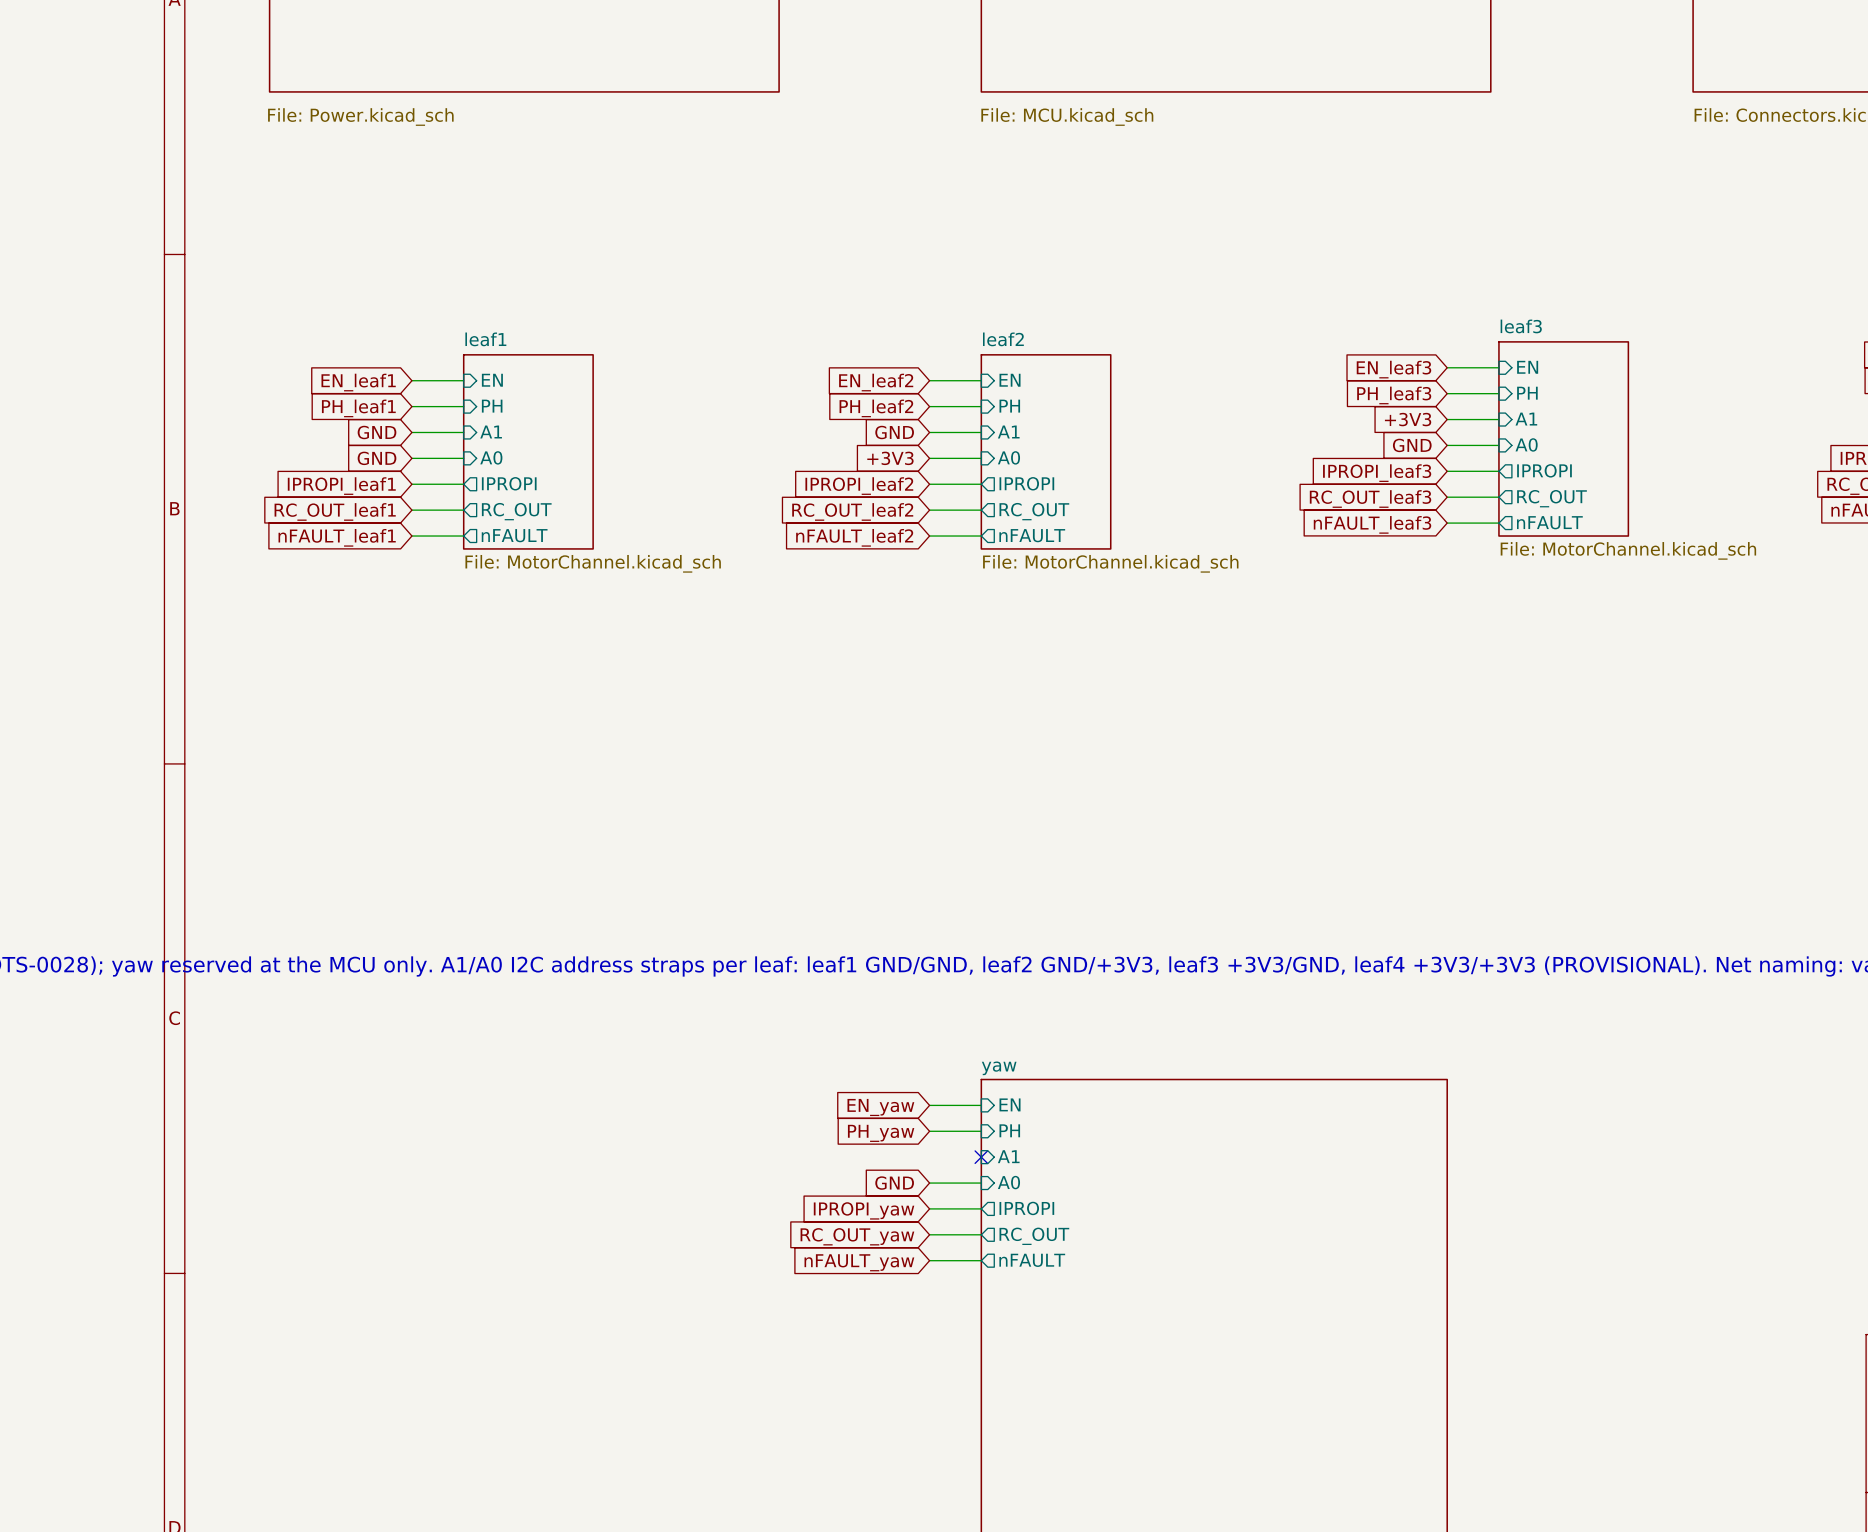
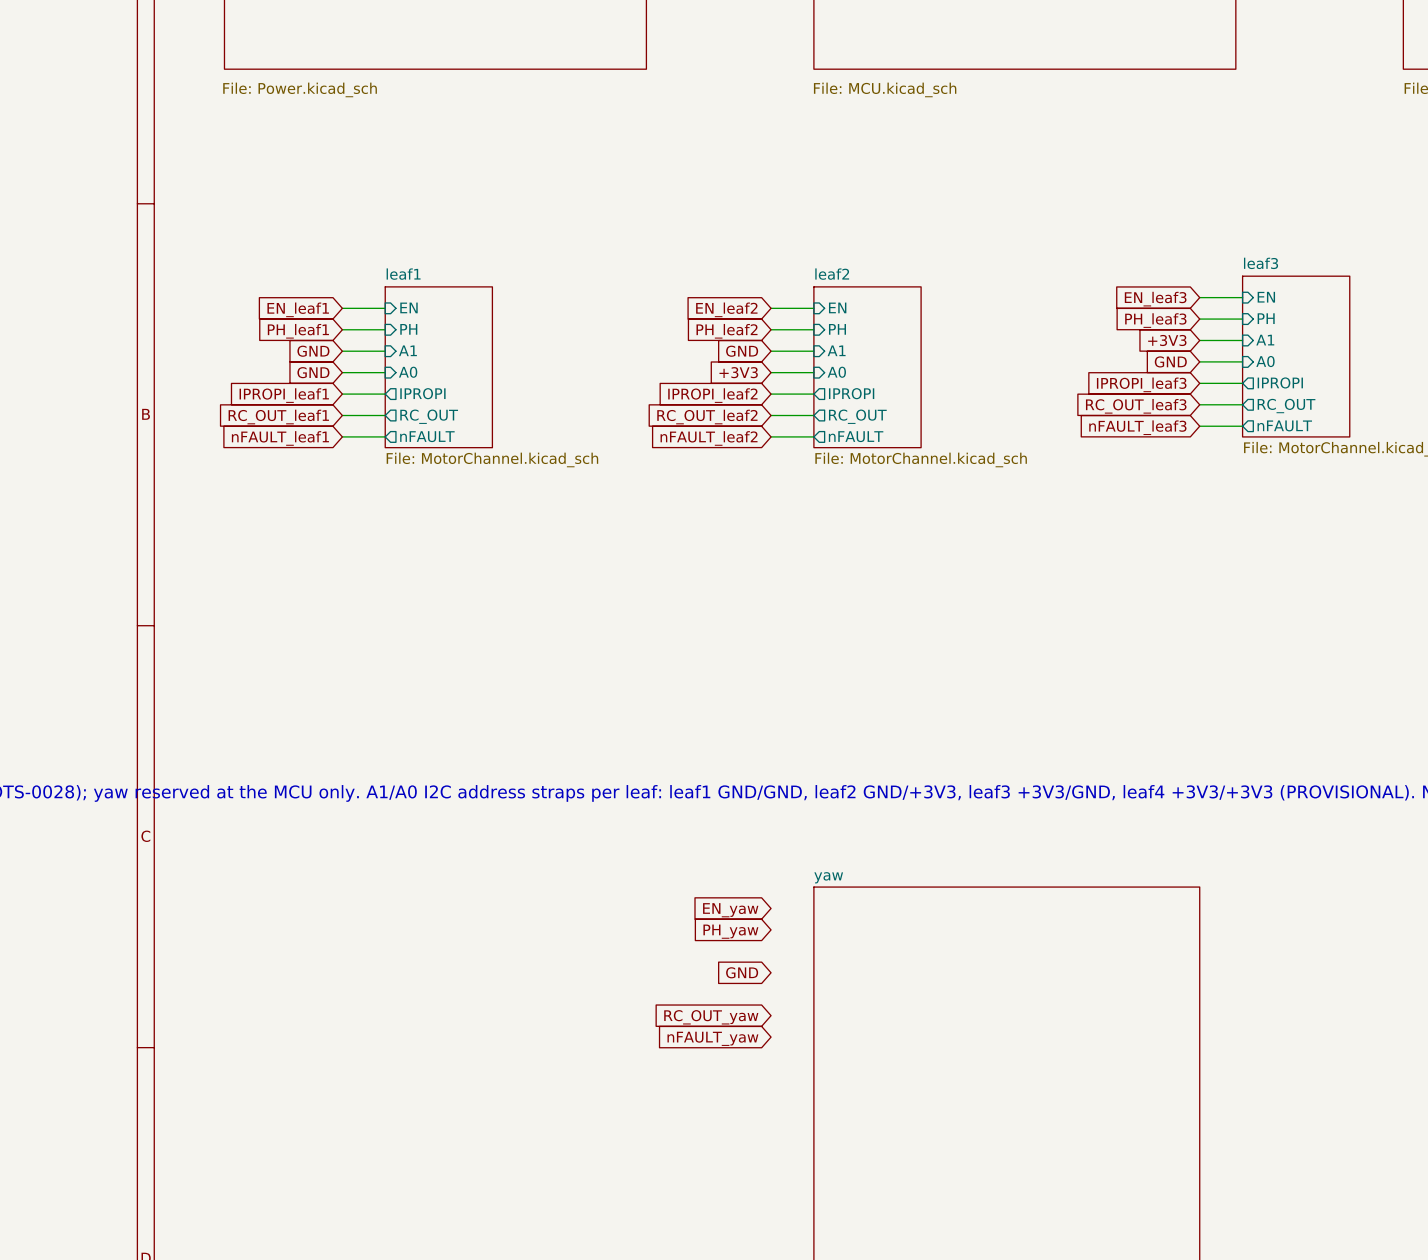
sheet pin: EN (1010, 1104) -> none
wire: (929, 1105) (981, 1105) -> none
sheet pin: PH (1009, 1130) -> none
wire: (929, 1131) (981, 1131) -> none
sheet pin: A1 (1008, 1156) -> none
no-connect mark: (981, 1157) -> none
sheet pin: A0 (1008, 1182) -> none
wire: (929, 1183) (981, 1183) -> none
wire: (929, 1208) (981, 1208) -> none
sheet pin: IPROPI (1026, 1208) -> none
global label: IPROPI_yaw (864, 1210) -> none
wire: (929, 1234) (981, 1234) -> none
sheet pin: RC_OUT (1034, 1236) -> none
wire: (929, 1260) (981, 1260) -> none
sheet pin: nFAULT (1032, 1260) -> none

